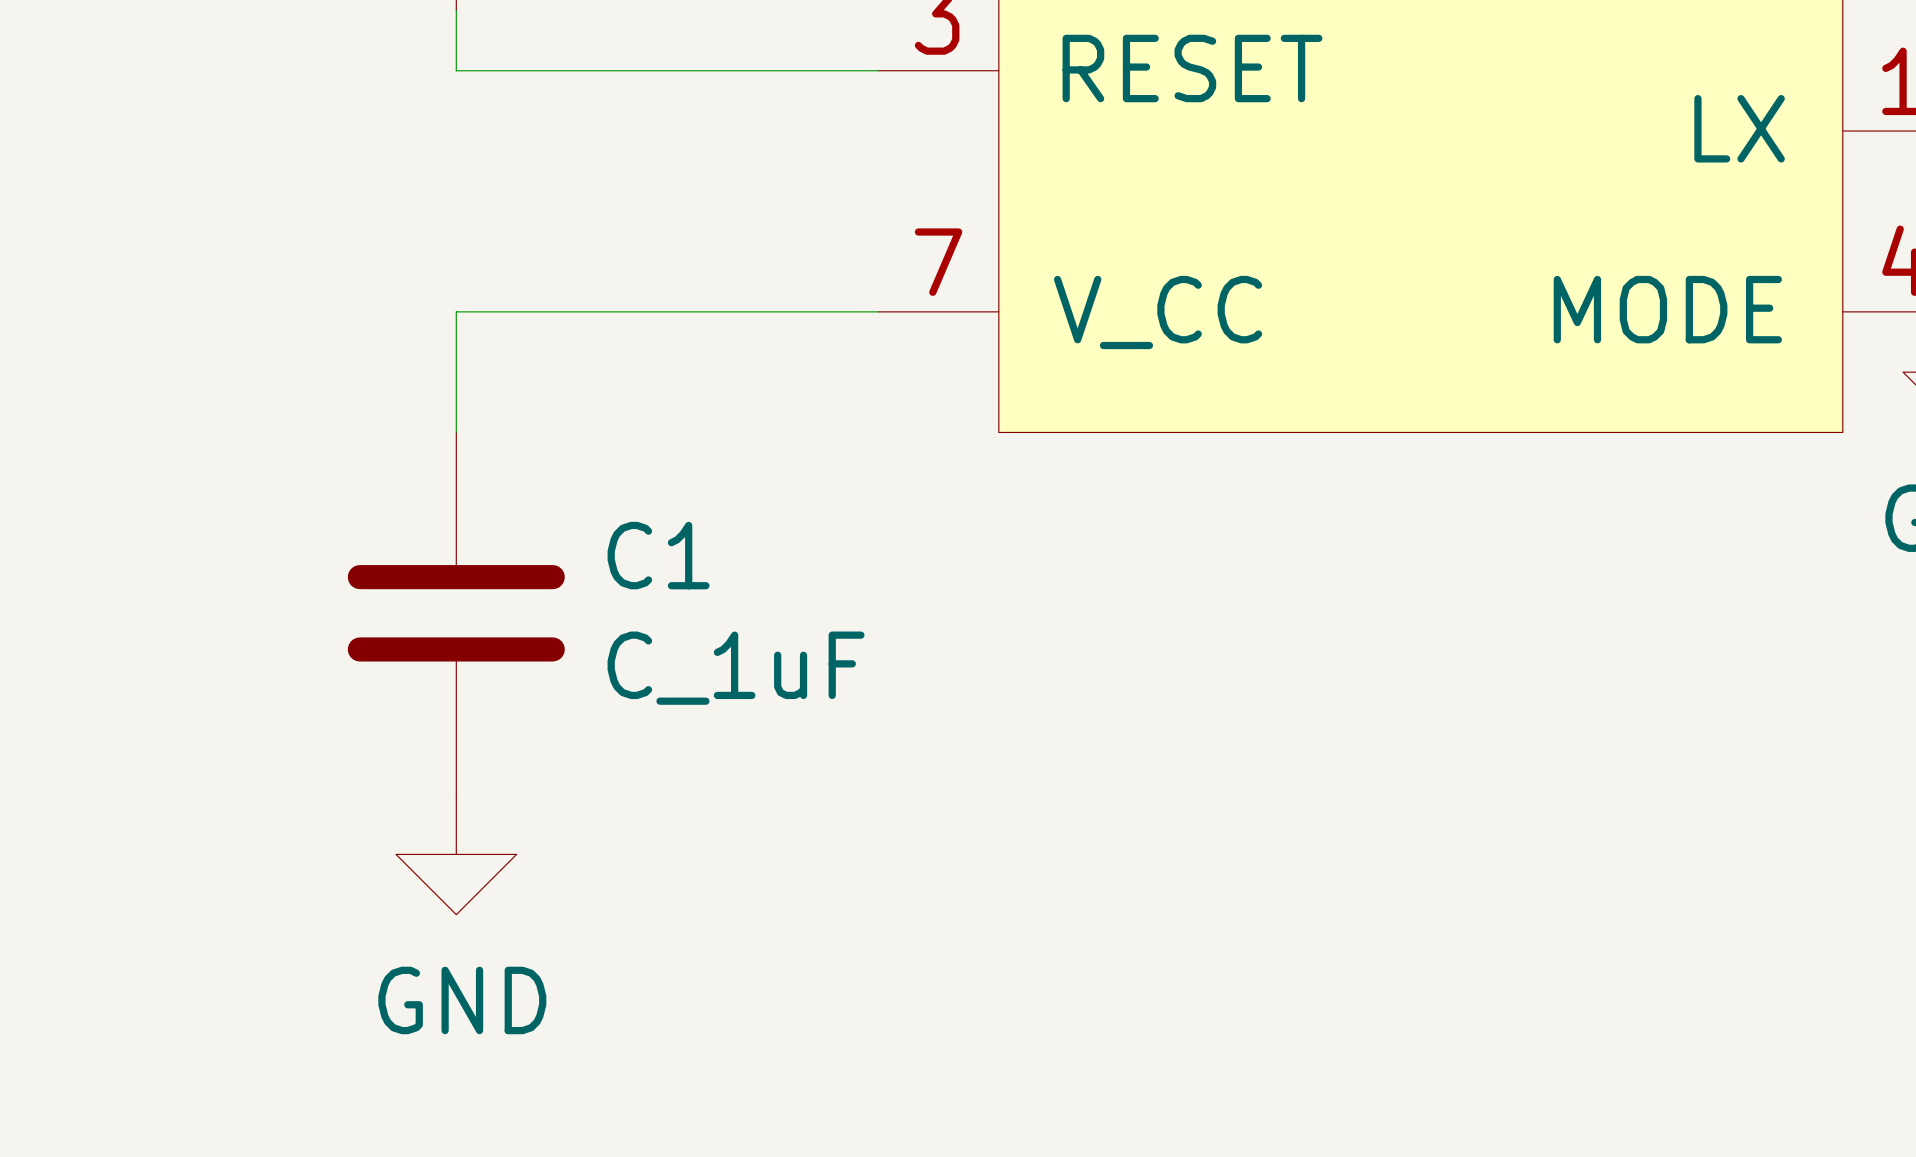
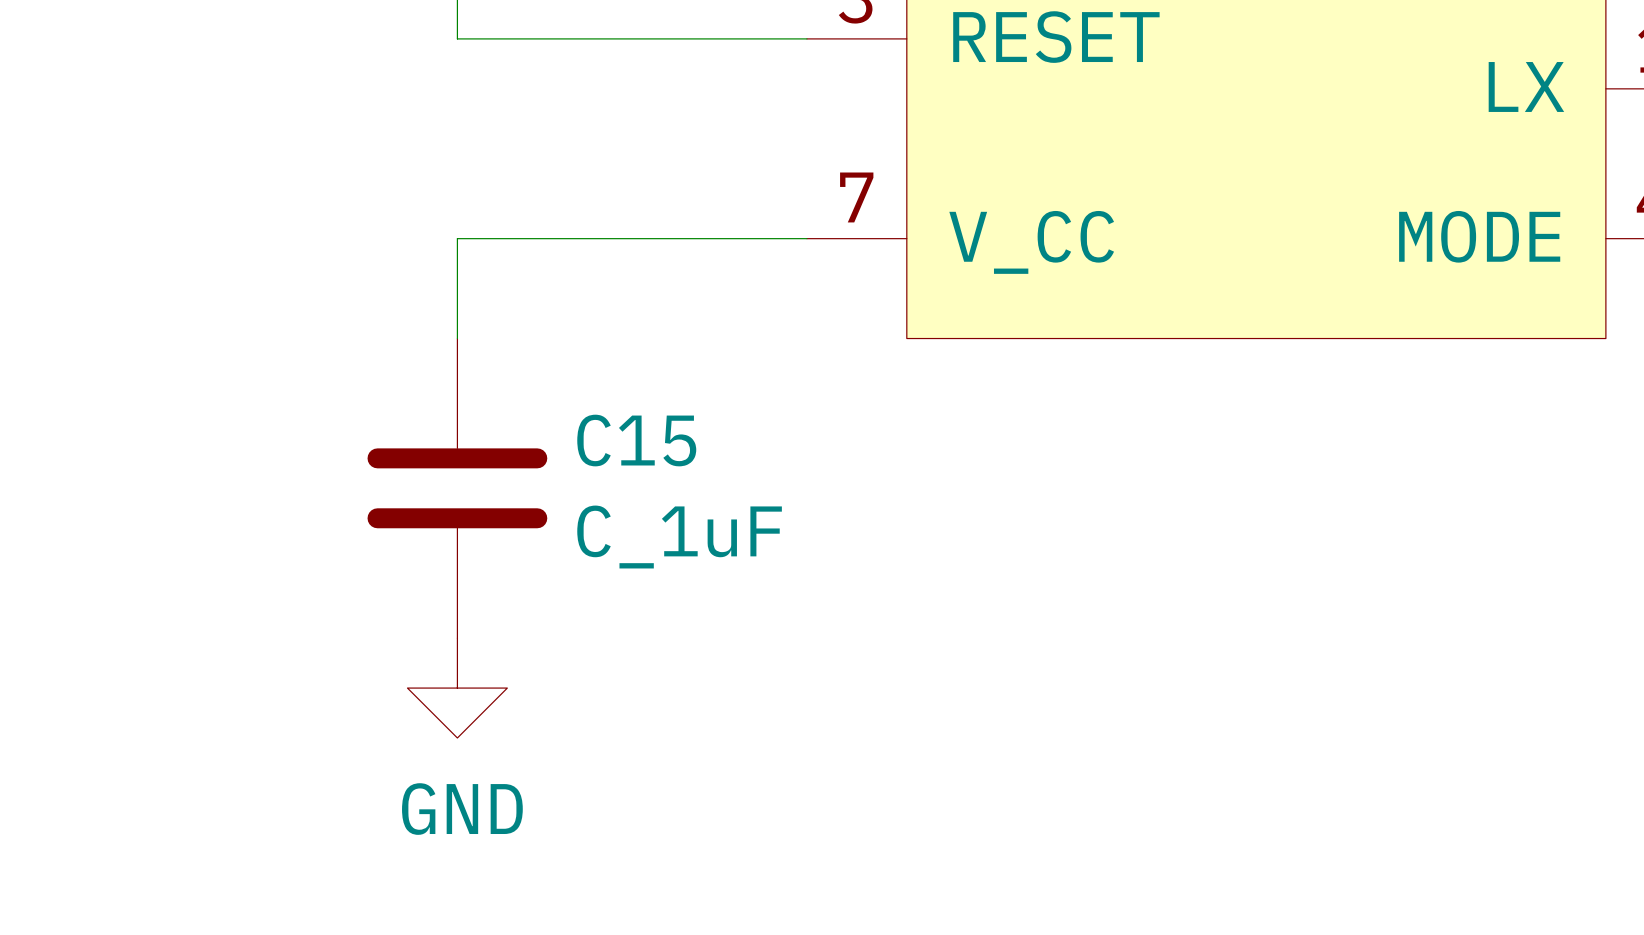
C1 name: C1 (658, 555) -> C15 (636, 440)

